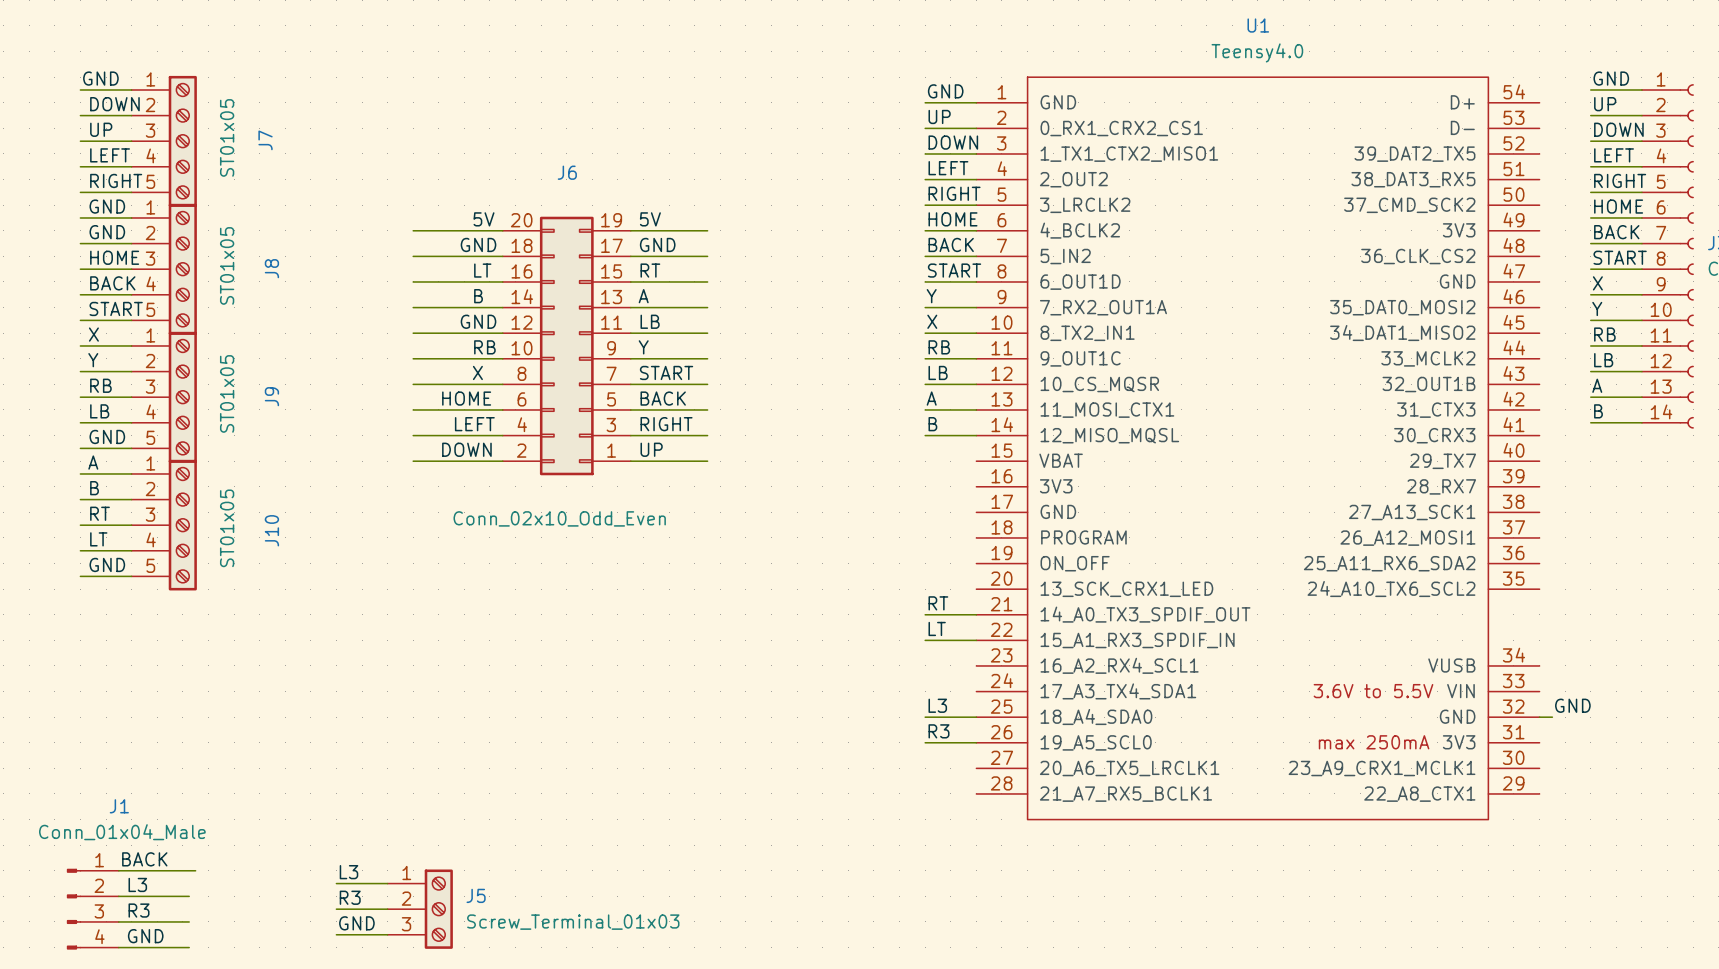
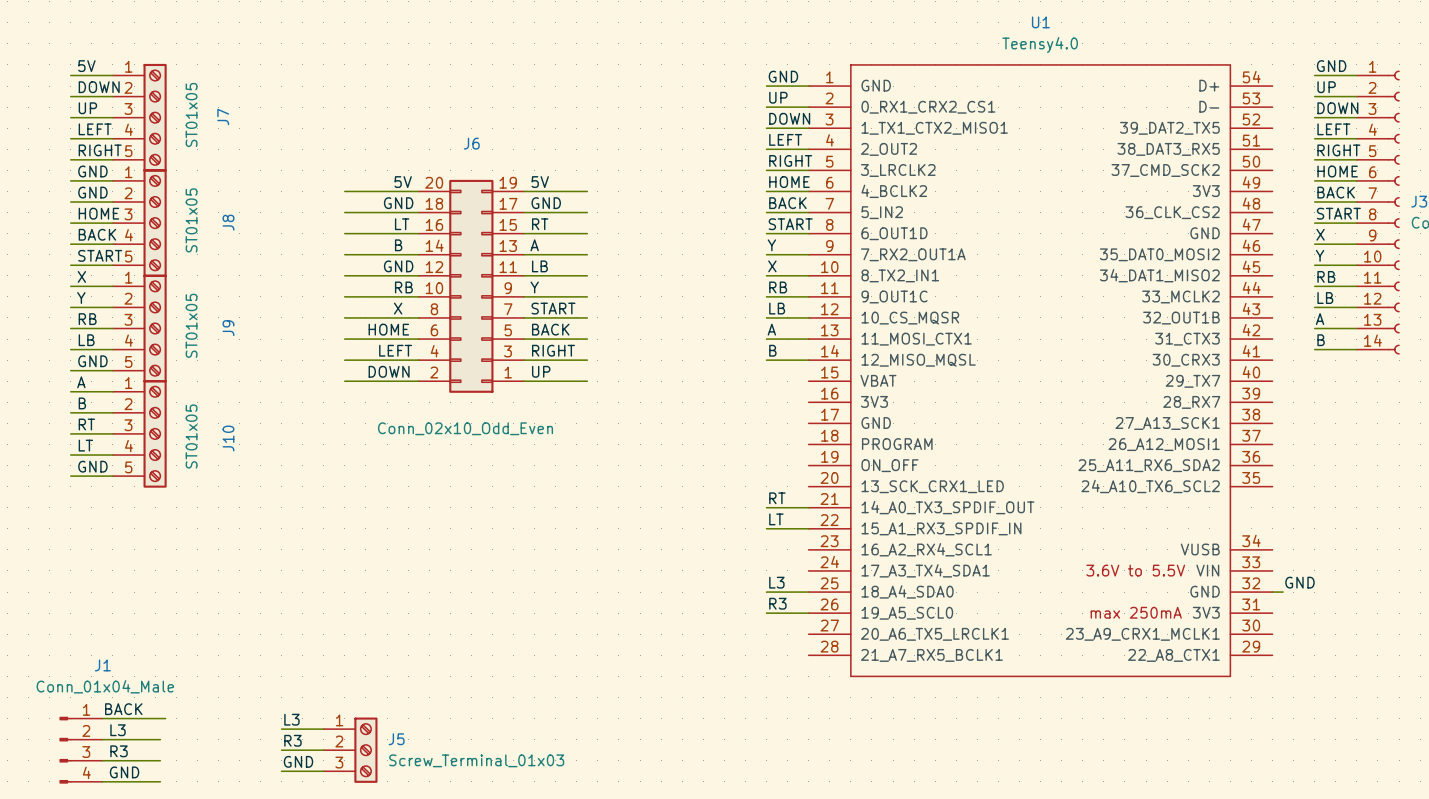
label: GND (100, 78) -> 5V (86, 66)

